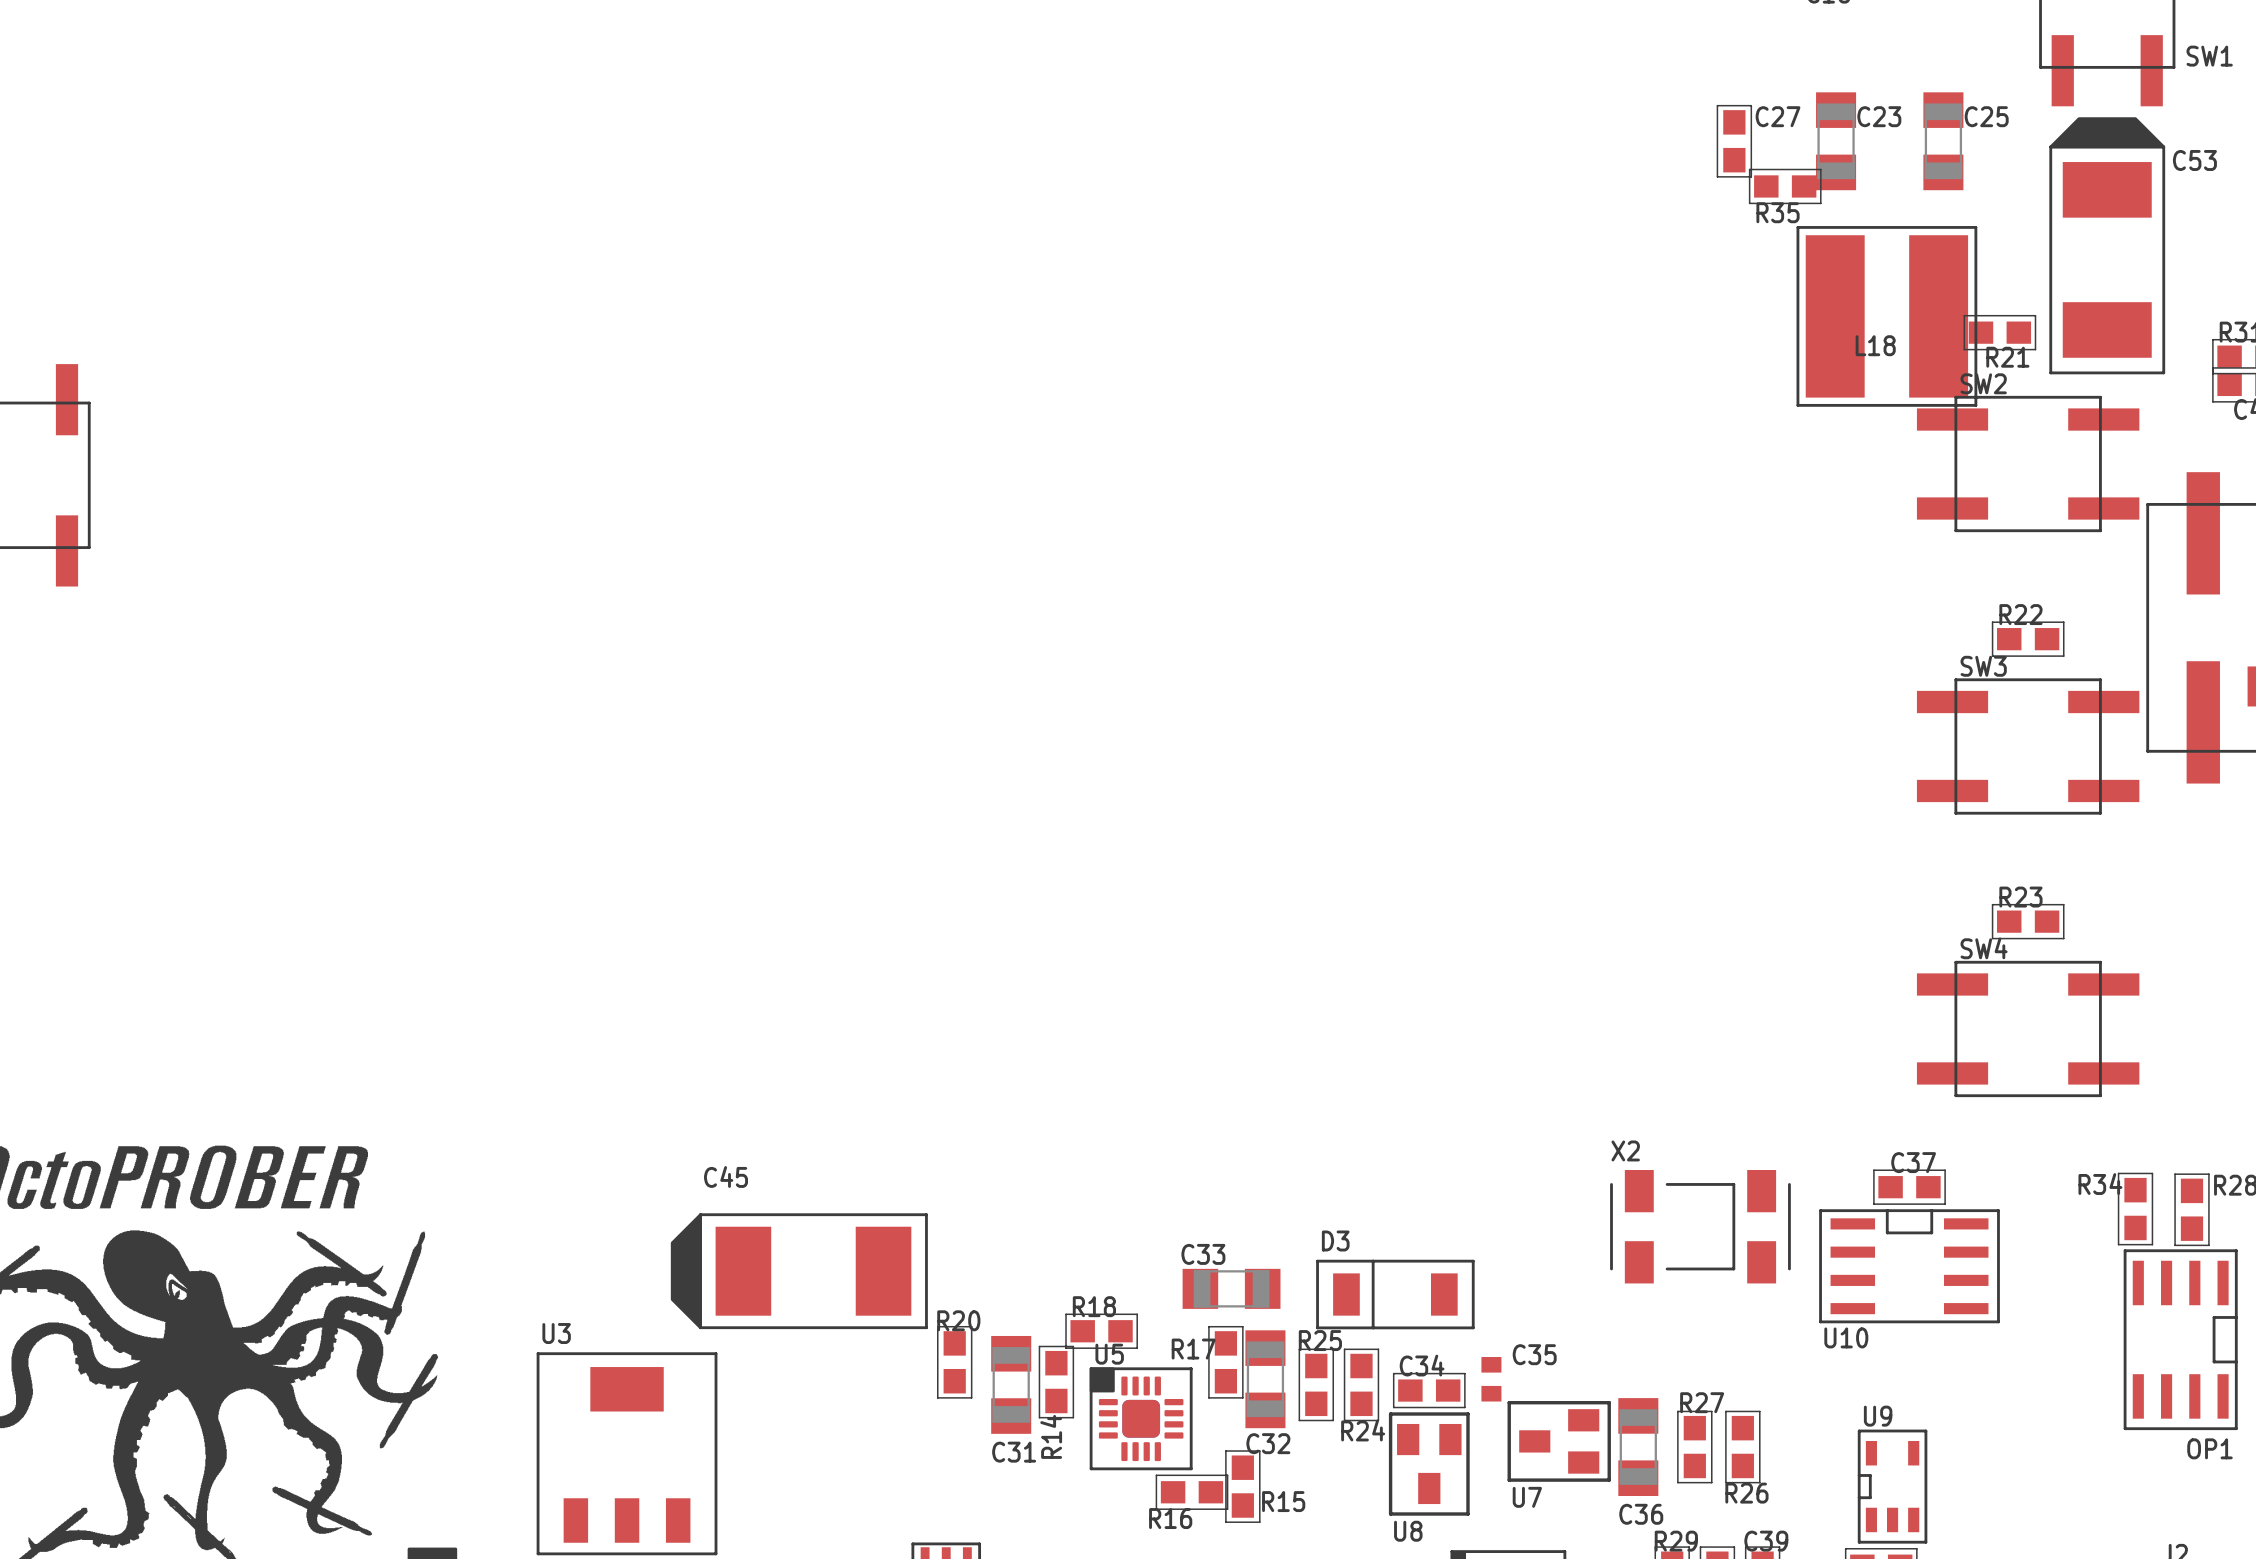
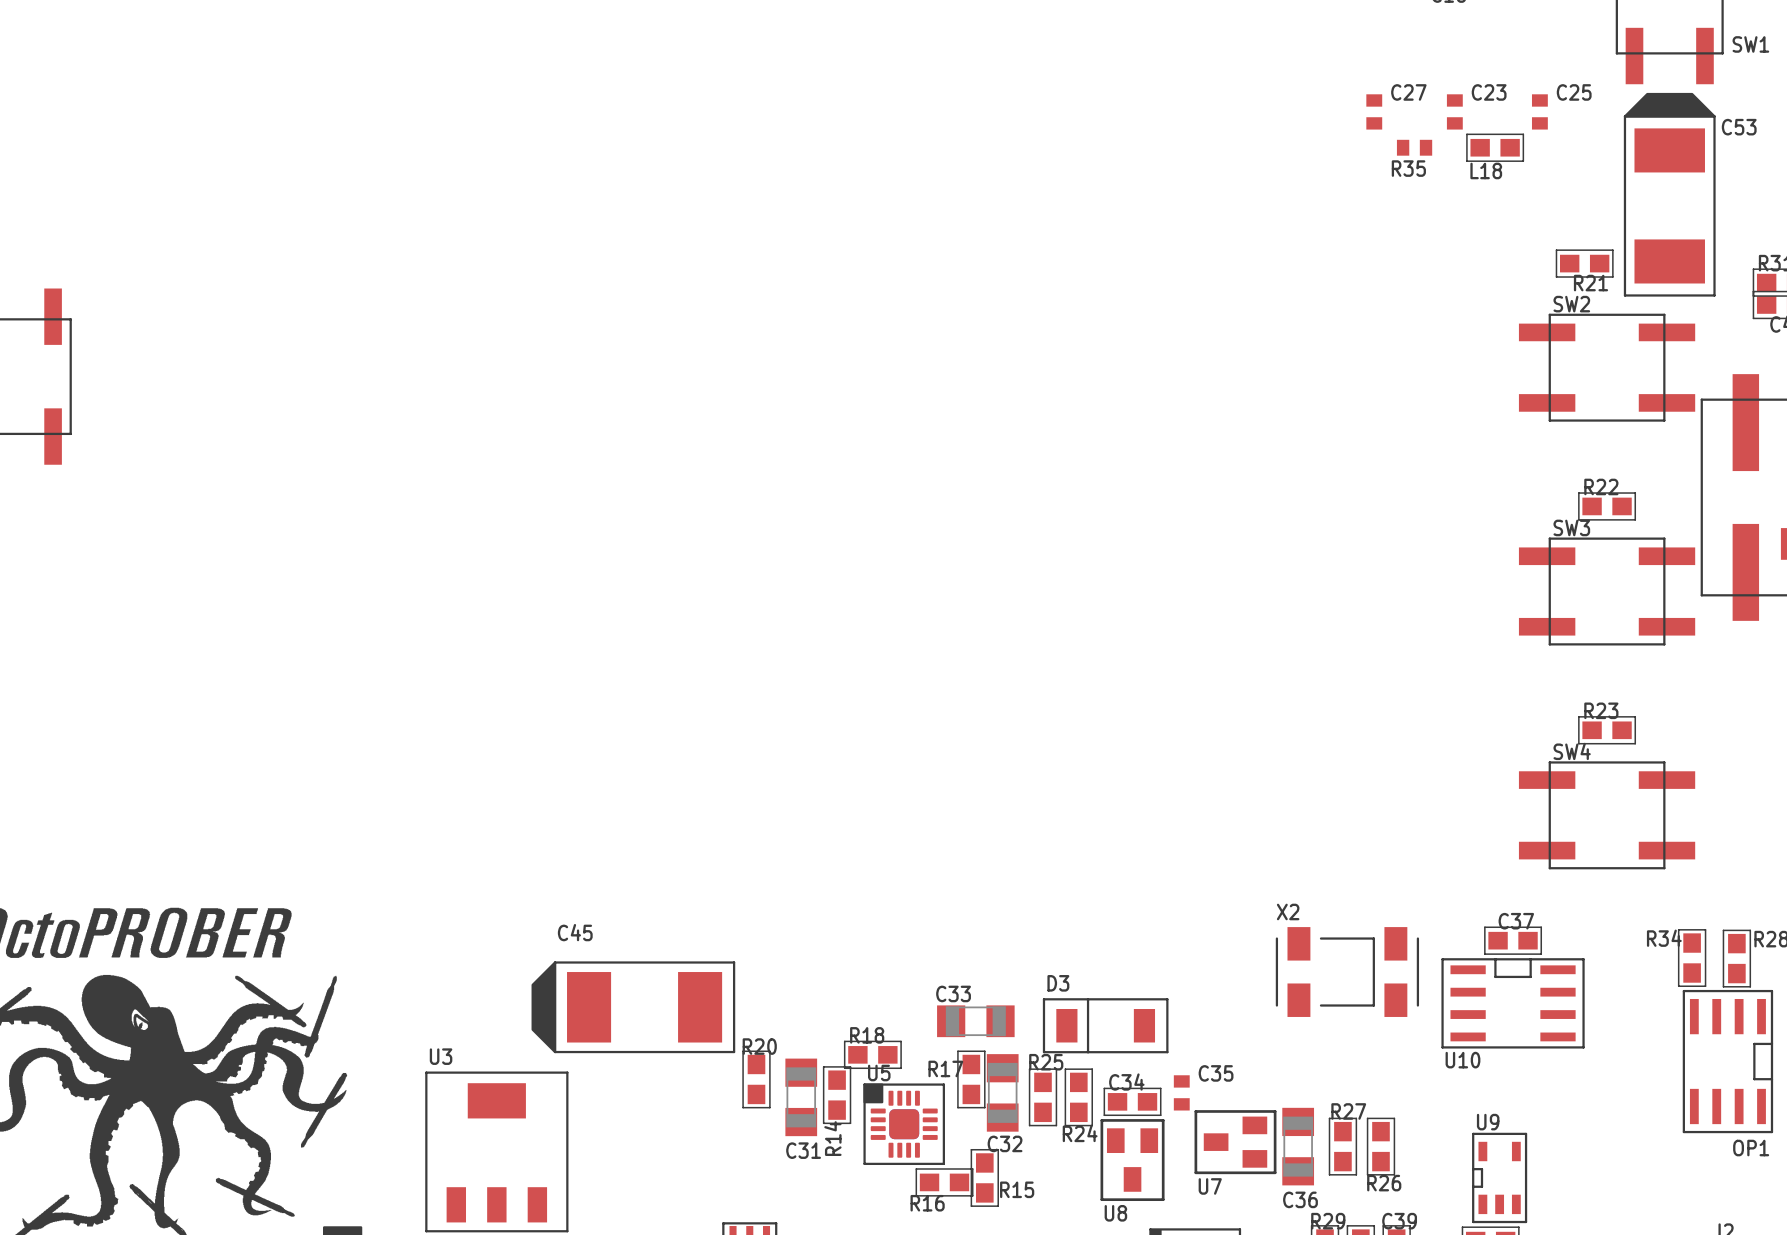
C23 footprint: [1816, 92, 1857, 191] -> [1446, 94, 1463, 130]
C25 footprint: [1923, 92, 1964, 191] -> [1531, 94, 1548, 130]
C27 footprint: [1716, 105, 1752, 178] -> [1366, 94, 1383, 130]
R35 footprint: [1749, 168, 1822, 204] -> [1396, 139, 1433, 156]
L18 footprint: [1796, 226, 1978, 407] -> [1466, 133, 1524, 162]

